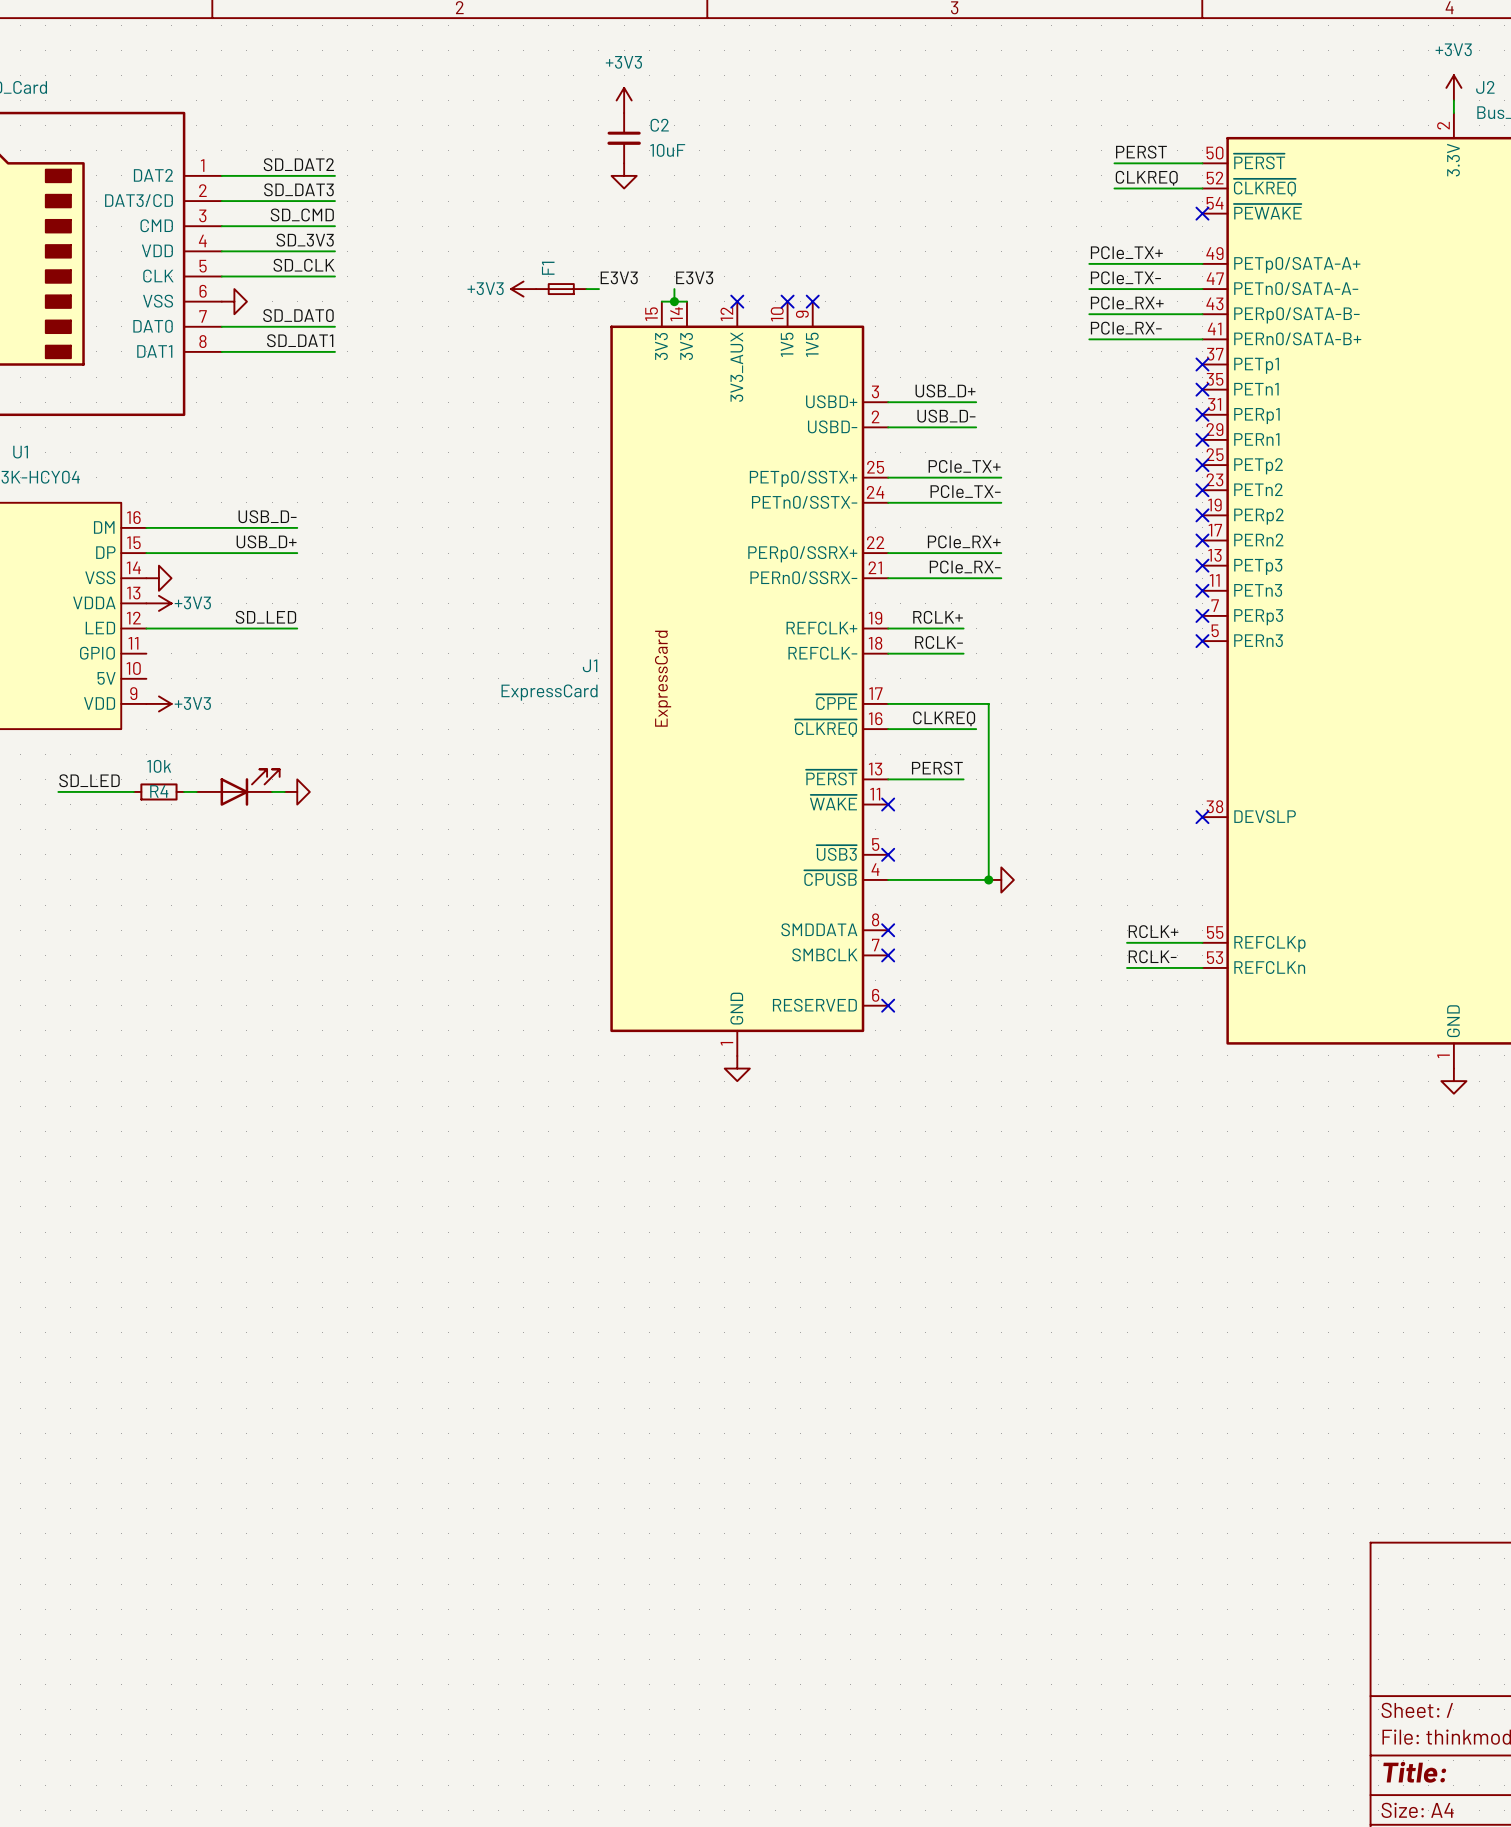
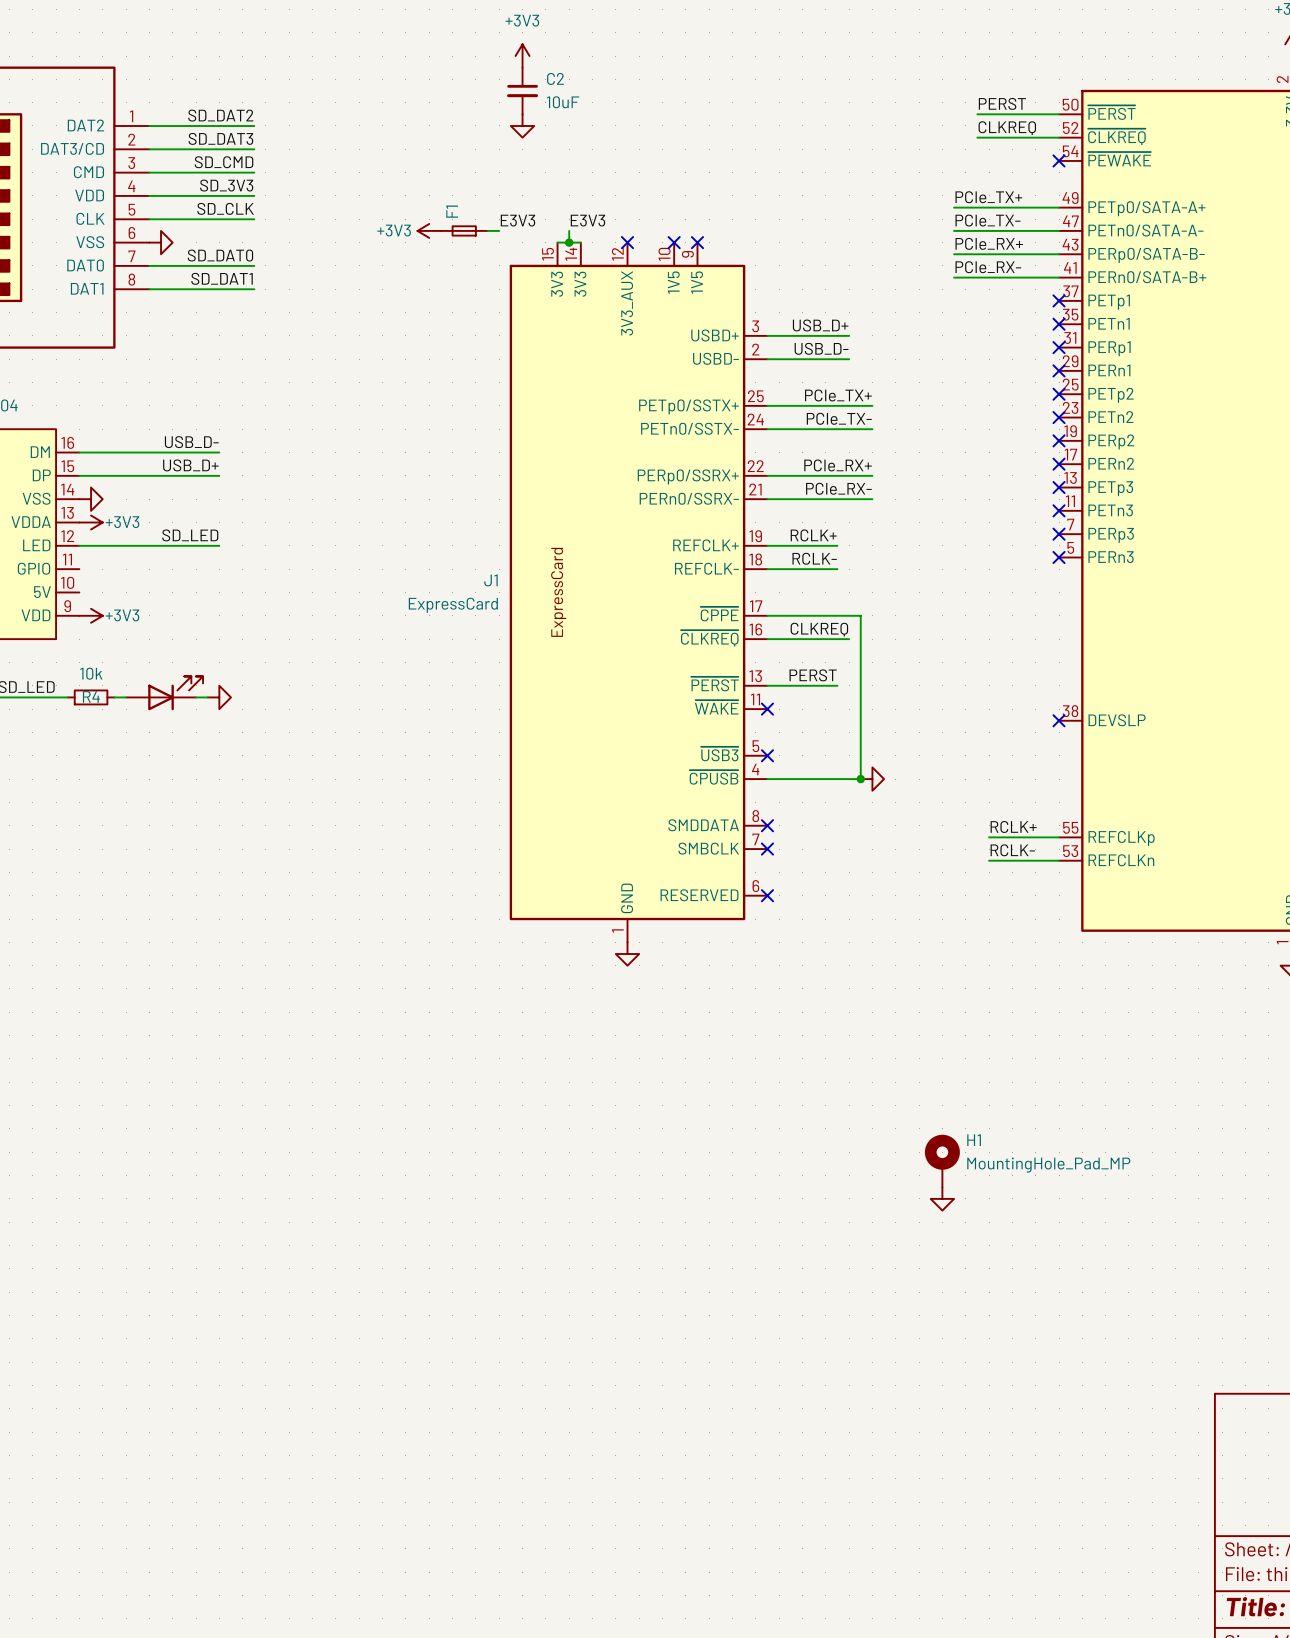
H1: none -> MountingHole_Pad_MP (942, 1161)
power symbol: none -> (942, 1198)

